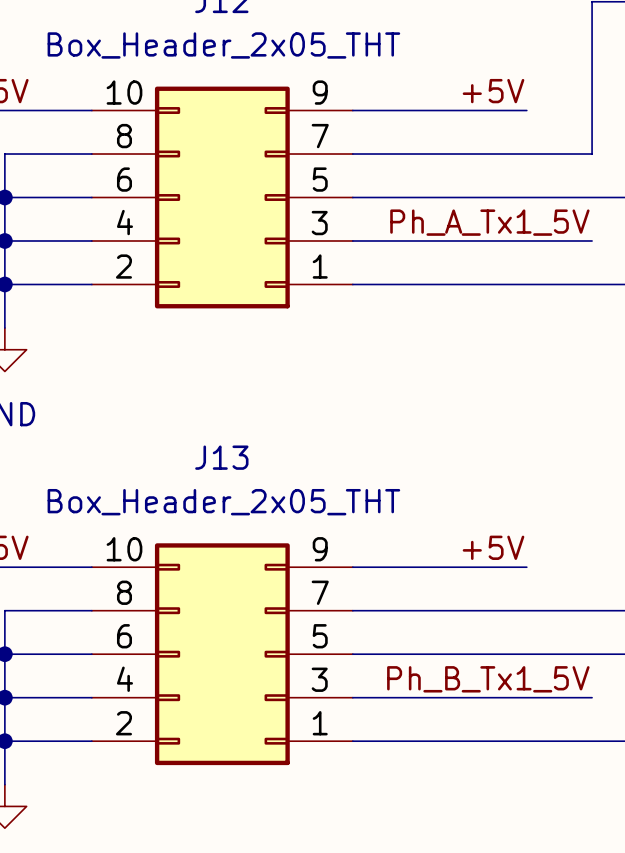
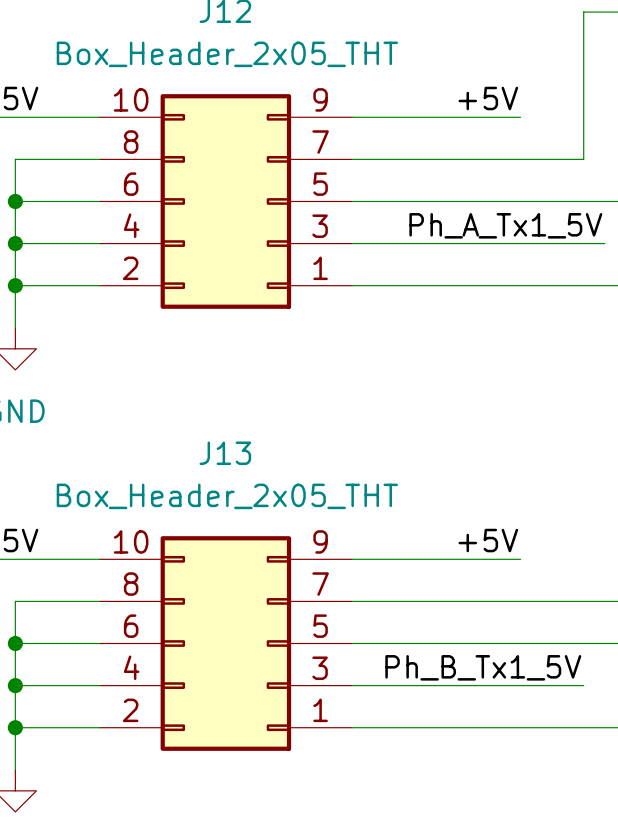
label position: Ph_A_Tx1_5V (489, 222) -> Ph_A_Tx1_5V (505, 225)
wire: none -> (583, 243) (604, 243)

